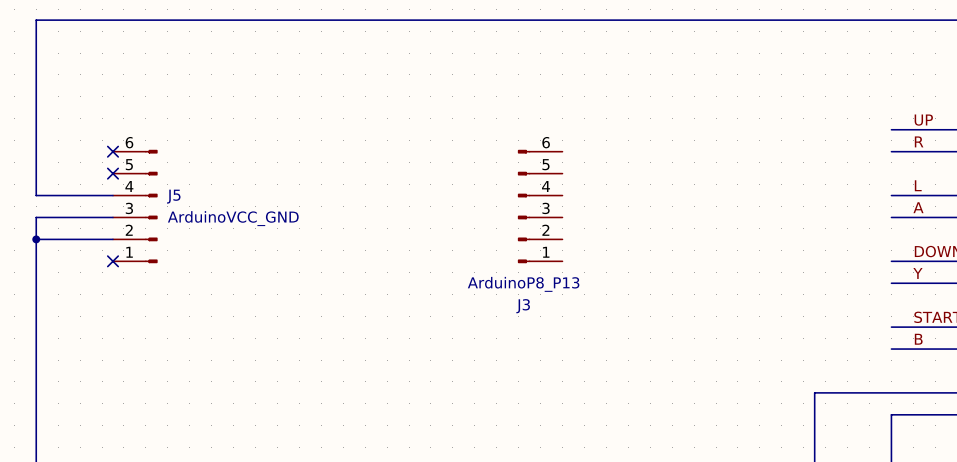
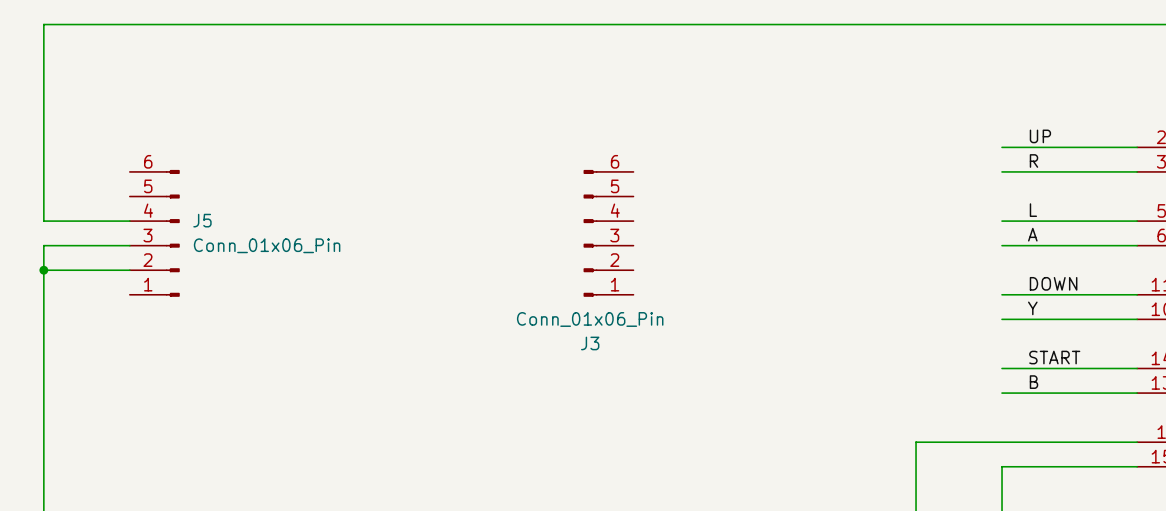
no-connect mark: (112, 151) -> none
no-connect mark: (112, 173) -> none
J5 value: ArduinoVCC_GND (233, 218) -> Conn_01x06_Pin (267, 245)
no-connect mark: (112, 261) -> none
J3 value: ArduinoP8_P13 (523, 284) -> Conn_01x06_Pin (590, 319)

